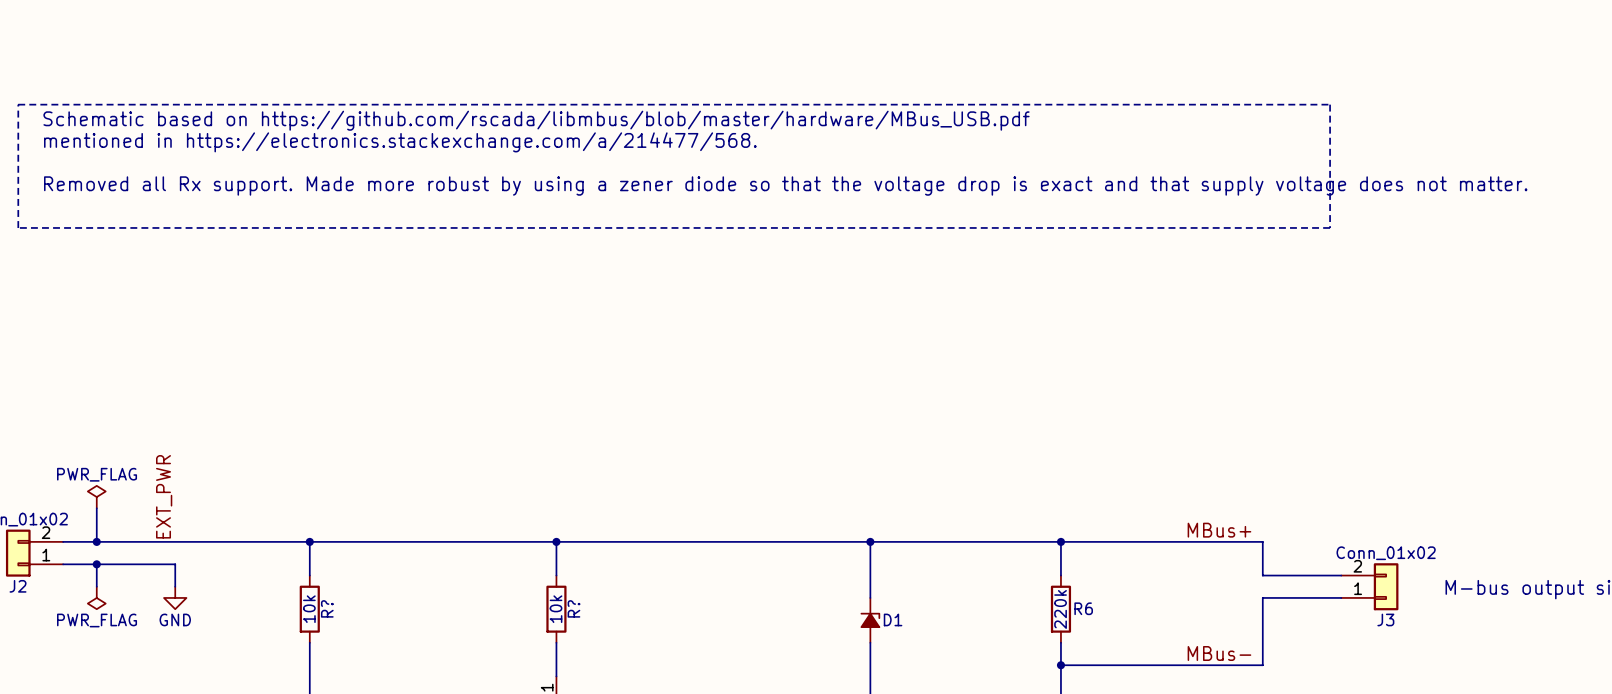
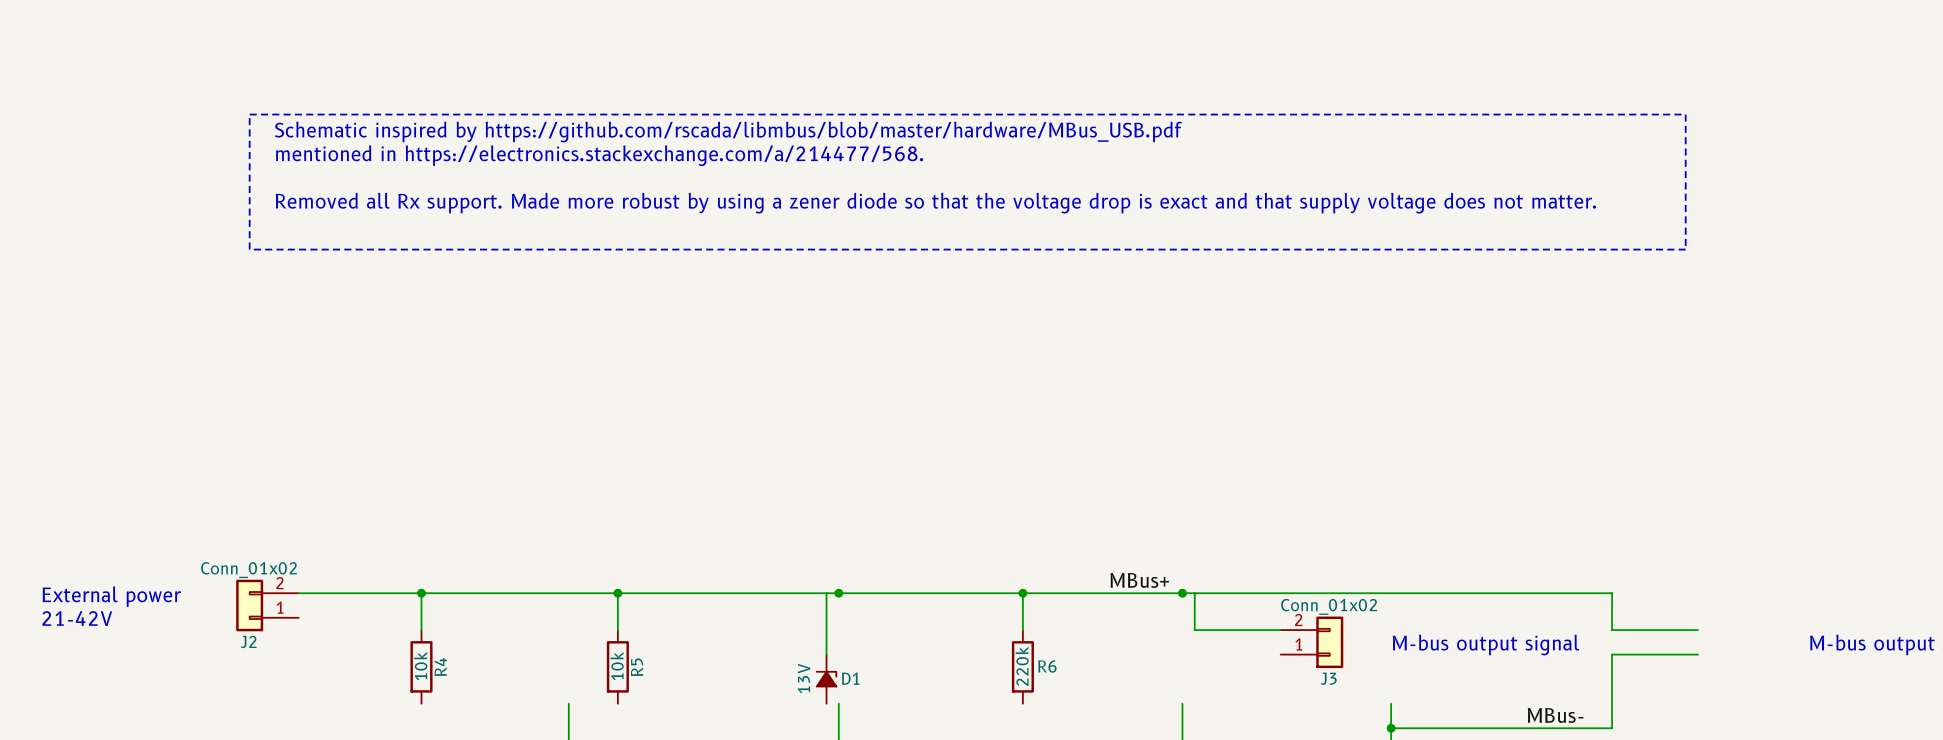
text: Schematic based on https://github.com/rscada/libmbus/blob/master/hardware/MBus_USB.pdf (536, 120) -> Schematic inspired by https://github.com/rscada/libmbus/blob/master/hardware/MBus_USB.pdf (728, 132)
label: EXT_PWR (164, 496) -> none
power symbol: PWR_FLAG (96, 497) -> none
wire: (96, 508) (96, 541) -> none
label: none -> MBus+ (1139, 580)
label: MBus+ (1219, 530) -> none
junction: (96, 541) -> none
junction: none -> (421, 593)
wire: (309, 541) (309, 575) -> (617, 593) (617, 630)
junction position: (309, 541) -> (617, 593)
wire: none -> (826, 593) (826, 654)
wire: (556, 541) (556, 575) -> (1022, 593) (1022, 630)
junction: none -> (1022, 593)
wire: (870, 541) (870, 597) -> none
wire: none -> (1194, 593) (1194, 630) (1280, 630)
wire: (1060, 541) (1060, 575) -> none
junction: (1060, 541) -> none
wire: (63, 564) (175, 564) -> (421, 593) (421, 617)
wire: (96, 564) (96, 586) -> none
junction: (96, 564) -> none
J3 position: (1369, 586) -> (1311, 642)
text: none -> M-bus output signal (1486, 645)
power symbol: PWR_FLAG (96, 597) -> none
power symbol: GND (175, 597) -> none
R4: none -> 10k (421, 666)
R?: 10k (309, 609) -> none
R5: none -> 10k (617, 666)
R?: 10k (556, 609) -> none
R6 position: (1060, 609) -> (1022, 666)
D1 value: none -> 13V (804, 678)
D1 position: (870, 620) -> (826, 679)

